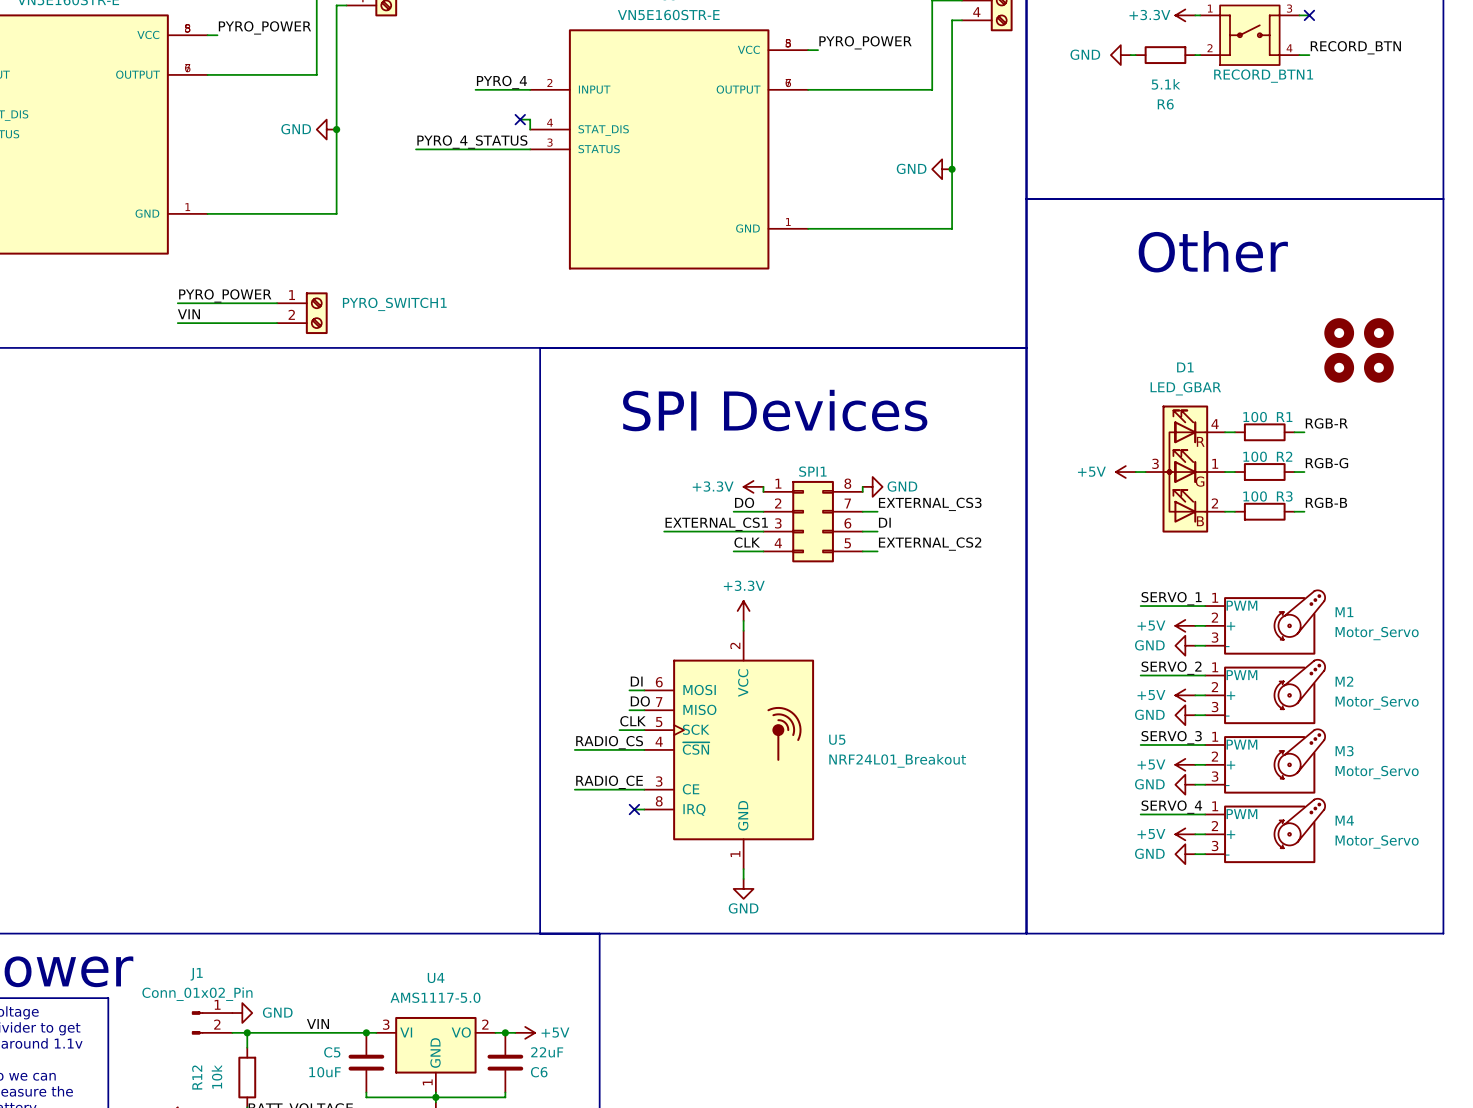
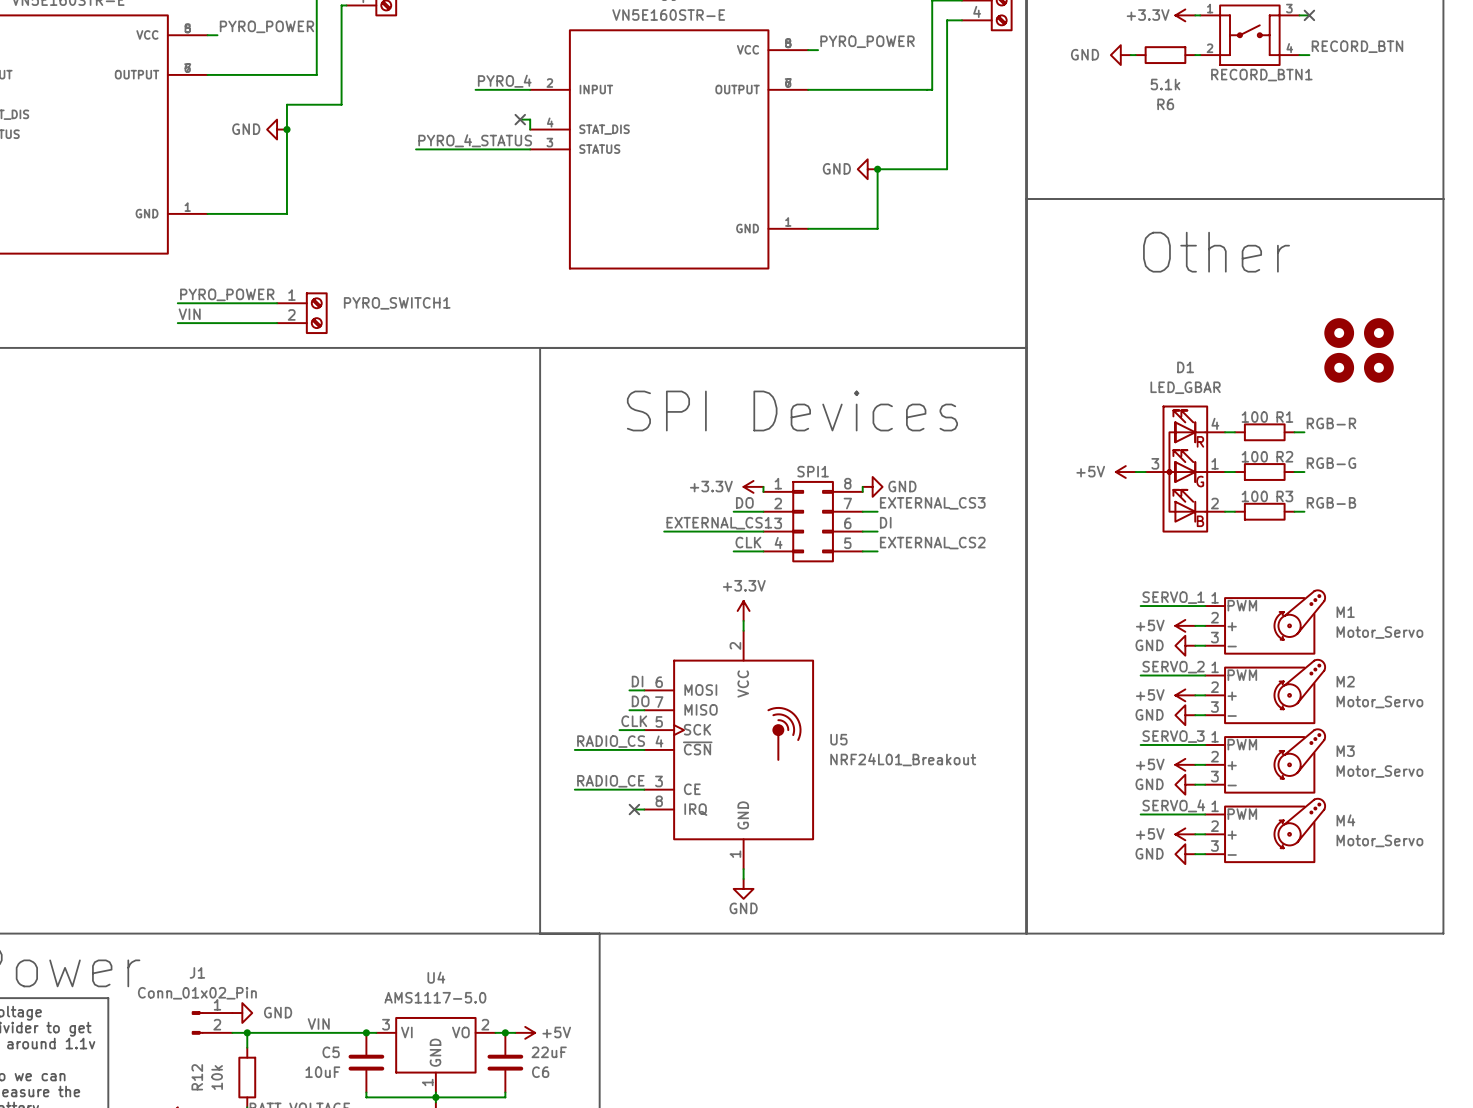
wire: (341, 5) (336, 5) (336, 213) (286, 213) -> (341, 5) (341, 104) (286, 104) (286, 213)
wire: (952, 20) (952, 228) (877, 228) -> (952, 20) (947, 20) (947, 169) (877, 169) (877, 228)
junction: none -> (286, 129)
power symbol position: GND (326, 129) -> GND (277, 129)
junction: (336, 129) -> none
junction: none -> (877, 169)
power symbol position: GND (942, 169) -> GND (867, 169)
junction: (952, 169) -> none

